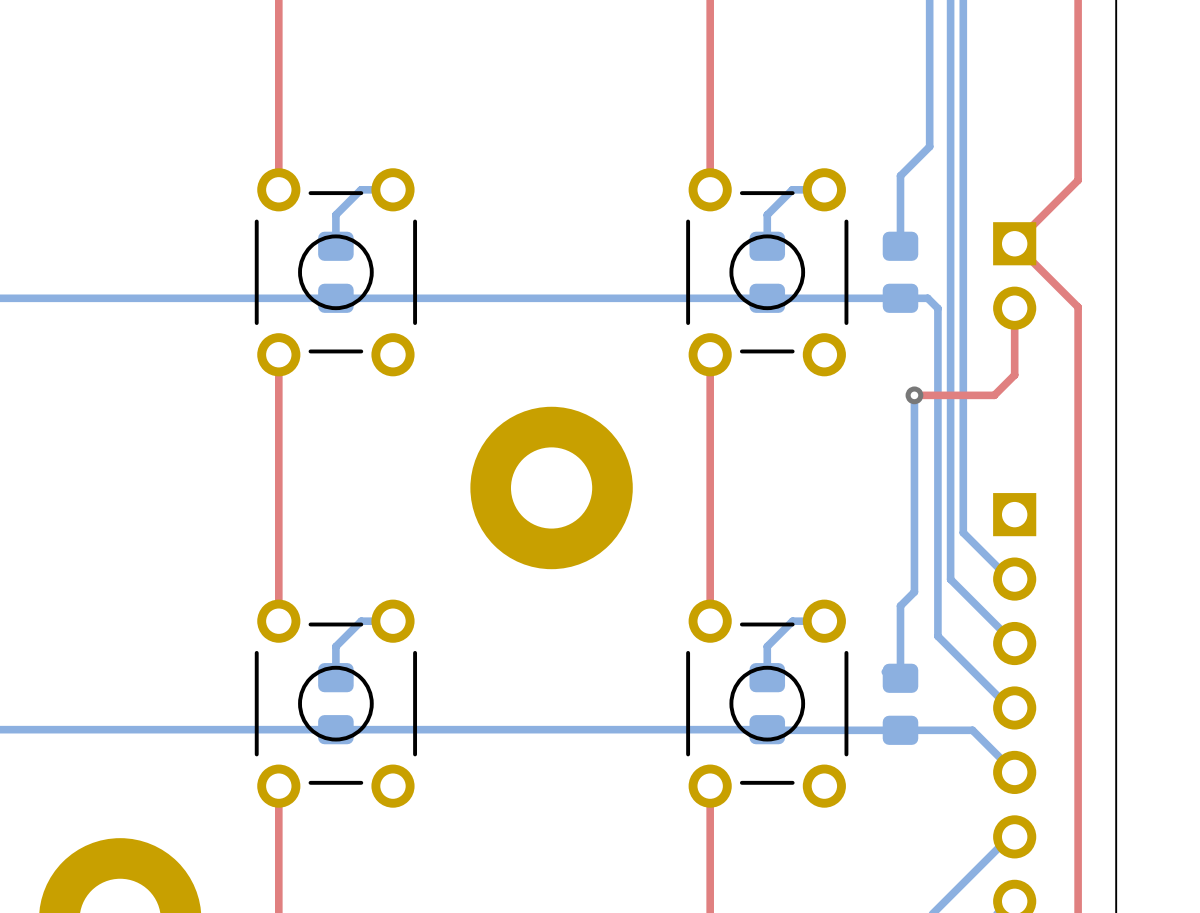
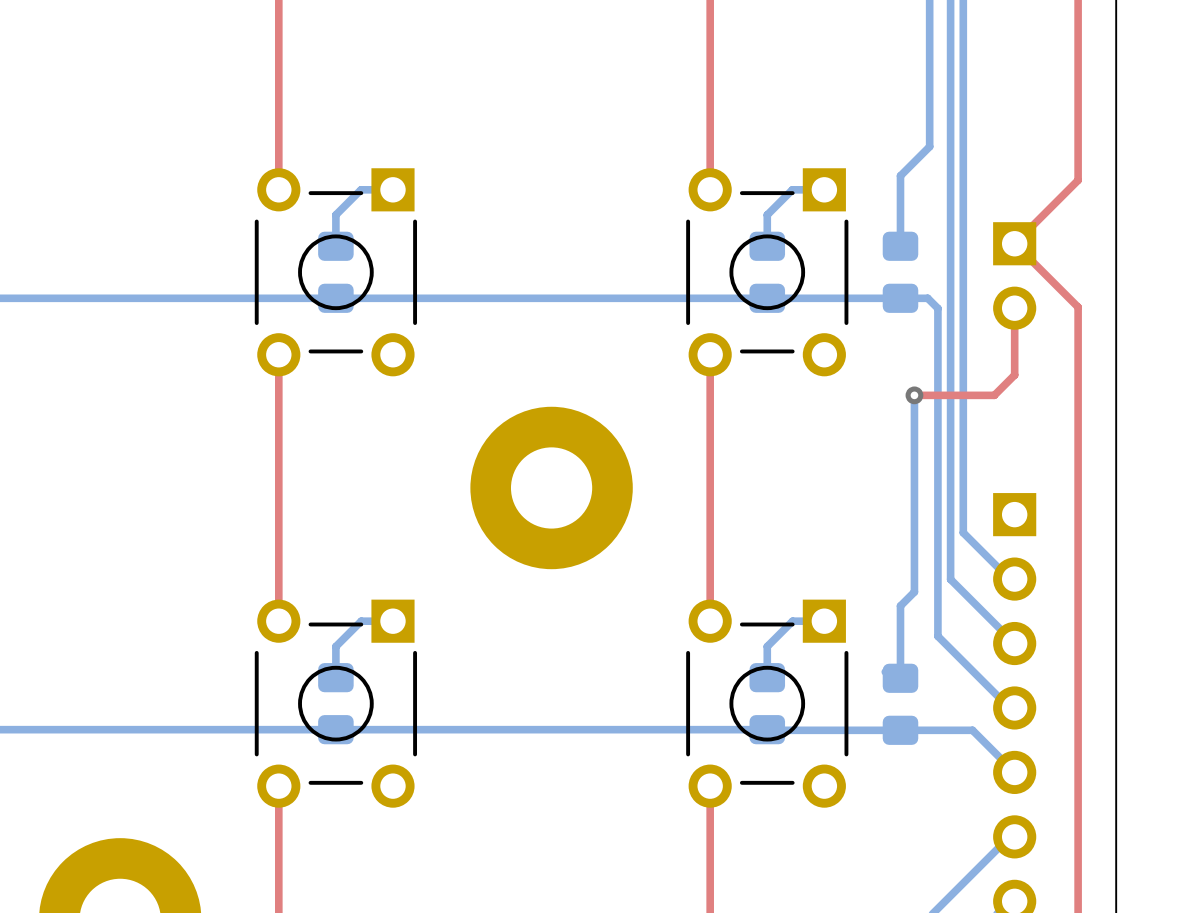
part footprint: [254, 168, 418, 377] -> [254, 168, 418, 377]
part footprint: [686, 168, 849, 377] -> [686, 168, 849, 377]
part footprint: [254, 599, 418, 808] -> [254, 599, 418, 808]
part footprint: [686, 599, 849, 808] -> [686, 599, 849, 808]

